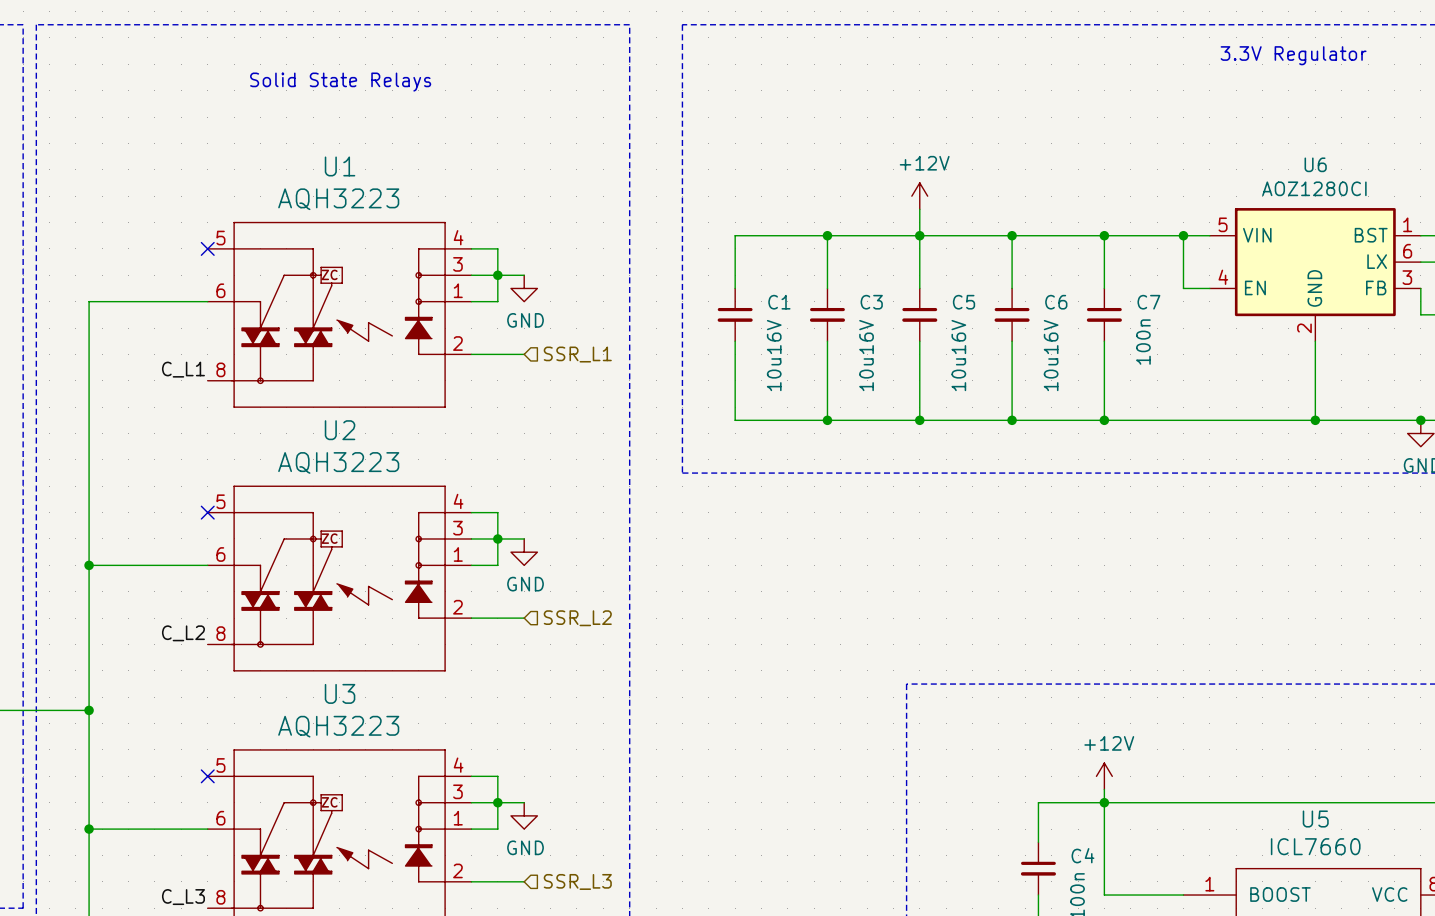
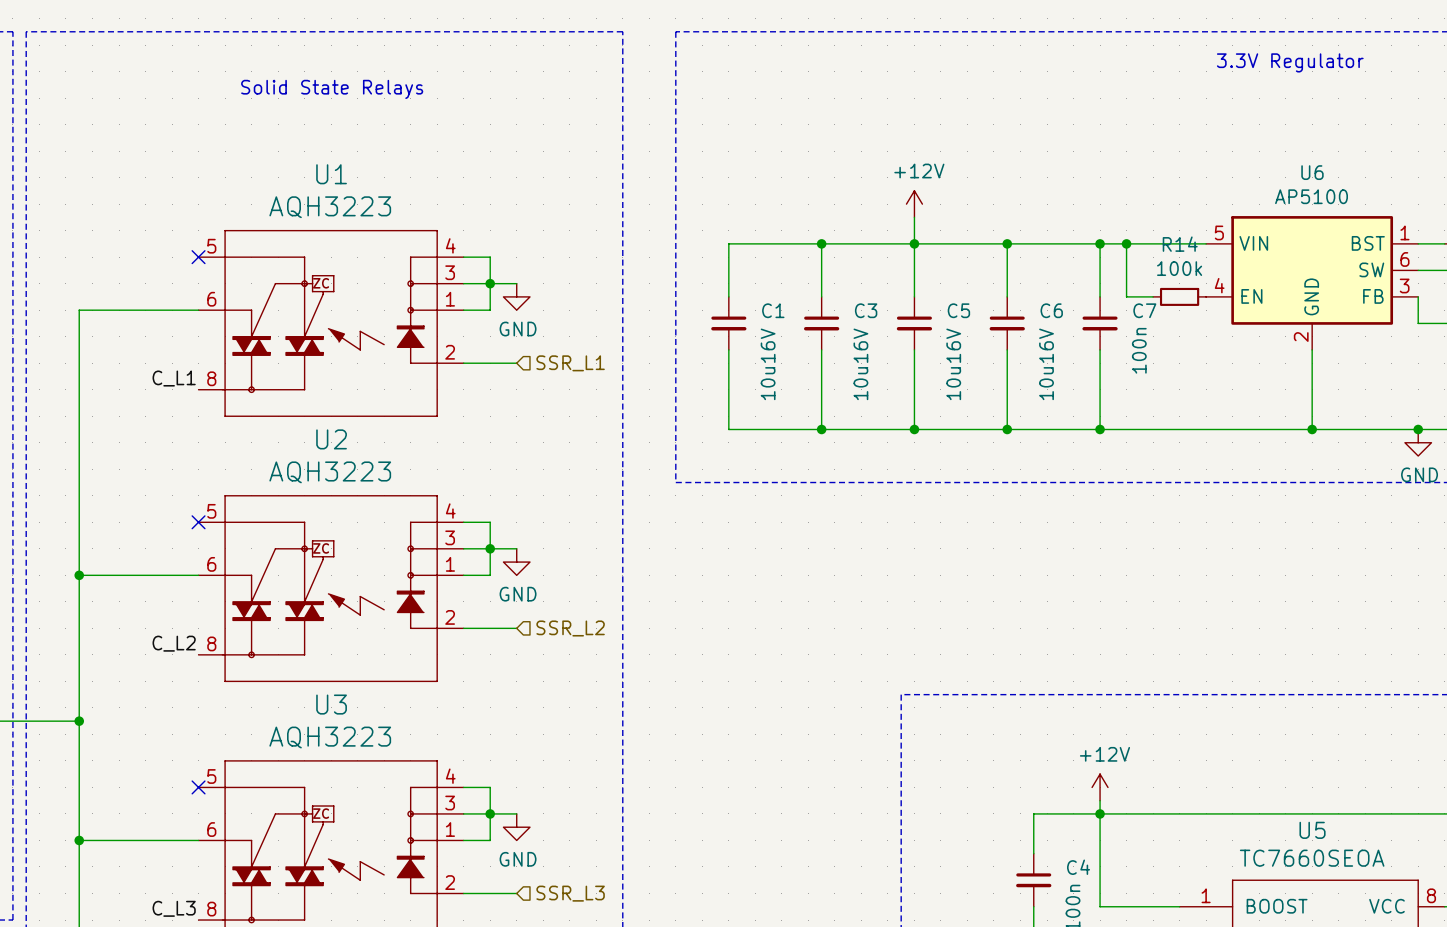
U6 value: AOZ1280CI (1314, 188) -> AP5100 (1311, 196)
wire: (1183, 235) (1183, 288) (1209, 288) -> (1126, 243) (1126, 296) (1153, 296)
junction position: (1183, 235) -> (1126, 243)
U6 pin name: LX (1377, 261) -> SW (1371, 269)
R14: none -> 100k (1179, 296)
U5 value: ICL7660 (1315, 846) -> TC7660SEOA (1312, 858)

